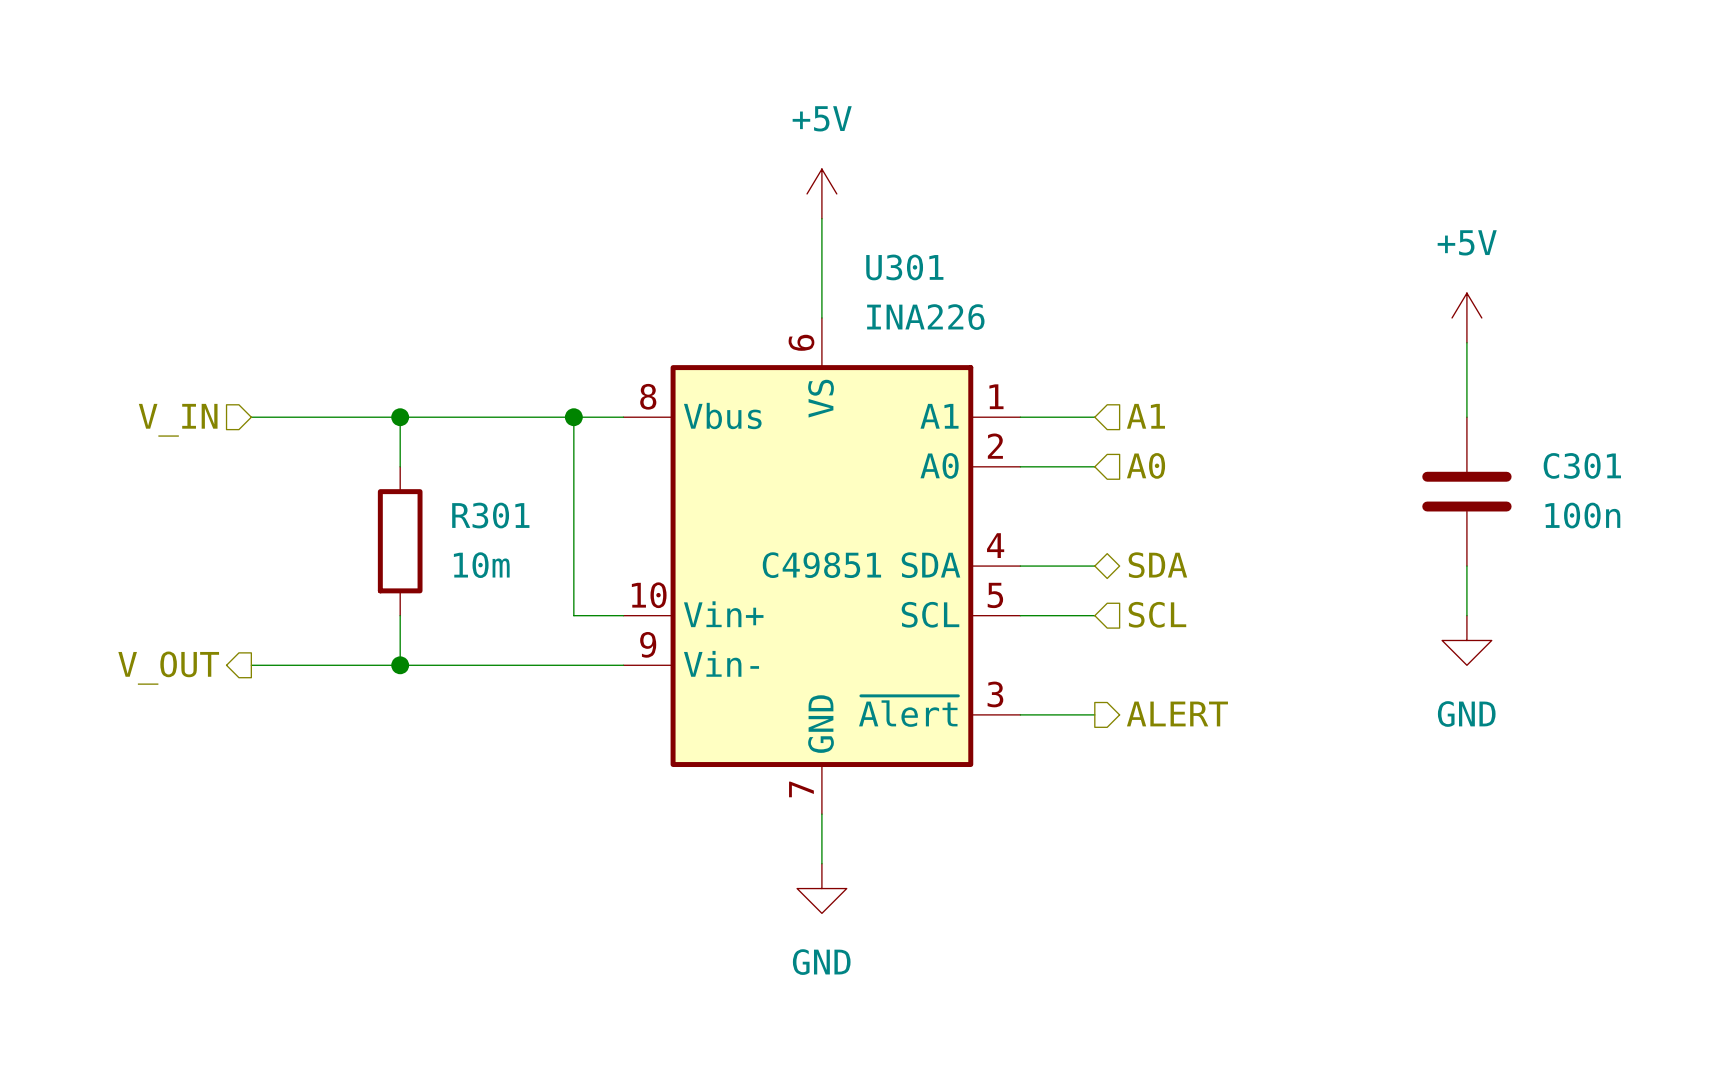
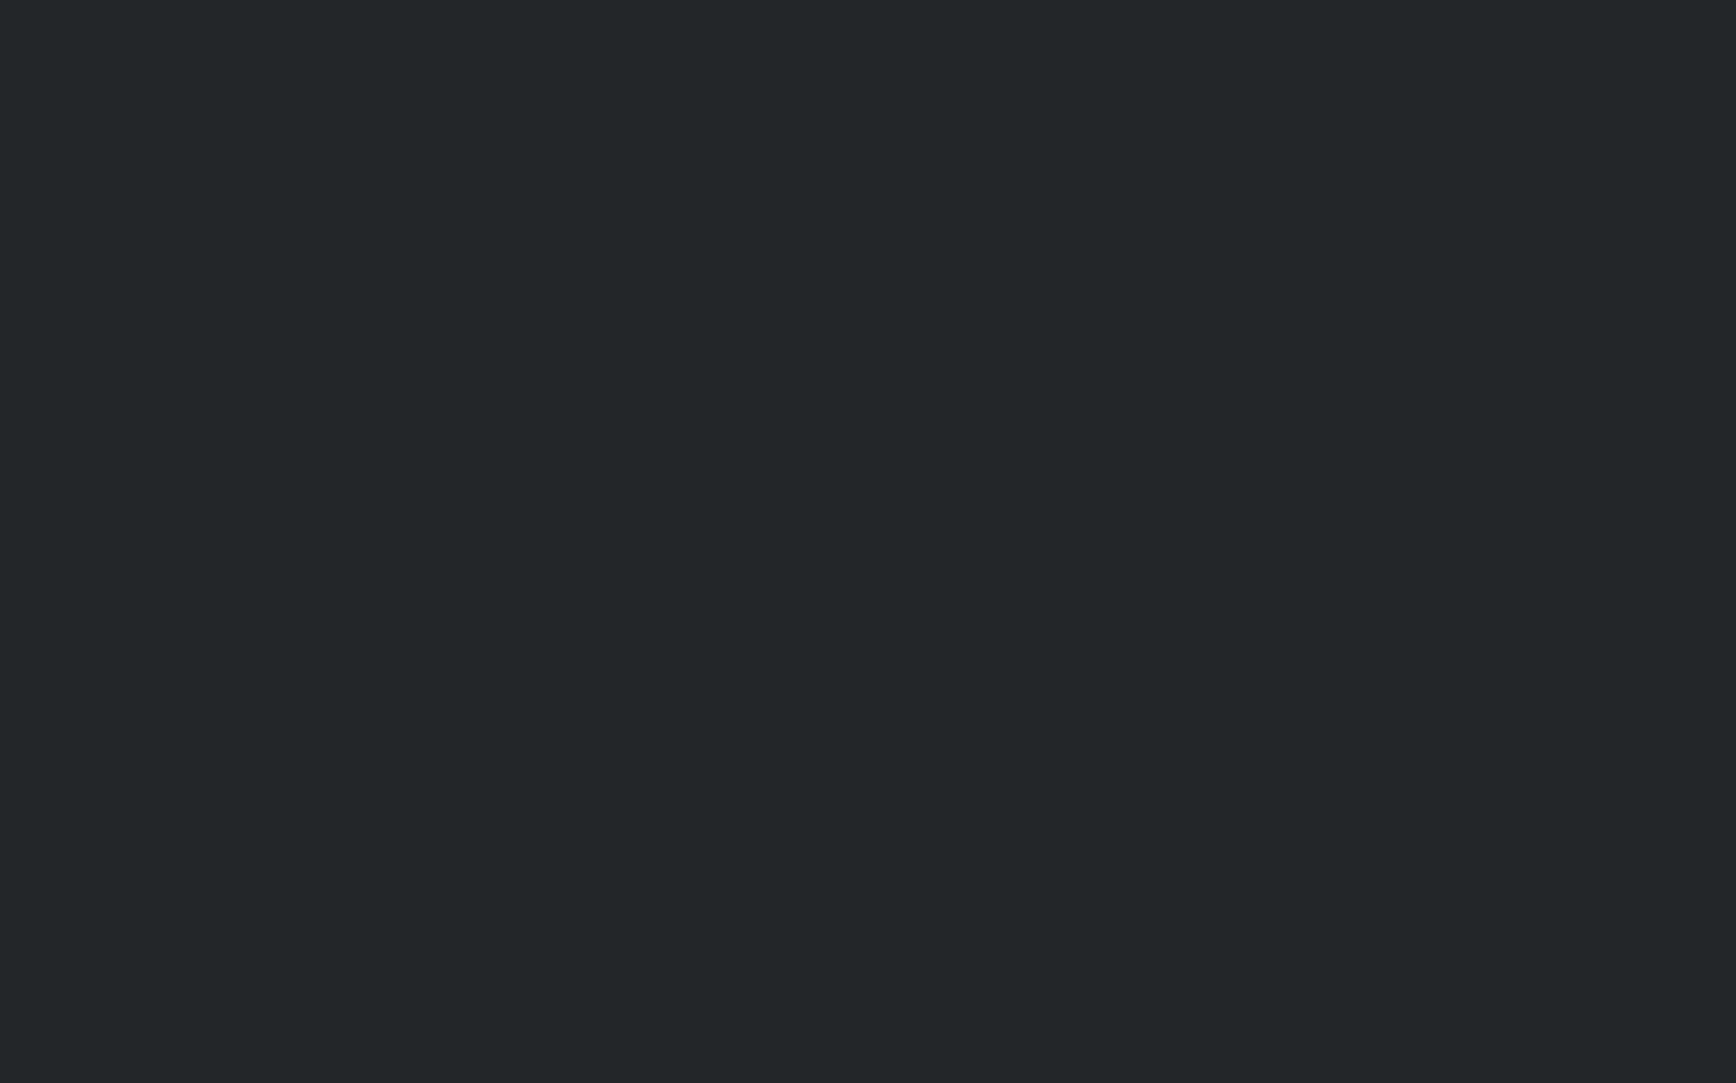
power symbol: +5V (821, 193) -> none
wire: (821, 218) (821, 317) -> none
power symbol: +5V (1466, 317) -> none
wire: (1466, 342) (1466, 417) -> none
hierarchical label: A1 (1145, 416) -> none
wire: (251, 417) (623, 417) -> none
wire: (400, 417) (400, 466) -> none
junction: (400, 417) -> none
wire: (573, 417) (573, 615) (623, 615) -> none
junction: (573, 417) -> none
wire: (1020, 417) (1094, 417) -> none
hierarchical label: V_IN (178, 420) -> none
hierarchical label: A0 (1146, 465) -> none
wire: (1020, 466) (1094, 466) -> none
C301: 100n (1466, 491) -> none
R301: 10m (400, 541) -> none
hierarchical label: SDA (1157, 565) -> none
U301: INA226 (821, 566) -> none
wire: (1020, 566) (1094, 566) -> none
wire: (1466, 566) (1466, 615) -> none
hierarchical label: SCL (1157, 614) -> none
wire: (400, 615) (400, 665) -> none
wire: (1020, 615) (1094, 615) -> none
power symbol: GND (1466, 640) -> none
wire: (251, 665) (623, 665) -> none
junction: (400, 665) -> none
hierarchical label: V_OUT (168, 668) -> none
hierarchical label: ALERT (1177, 713) -> none
wire: (1020, 714) (1094, 714) -> none
wire: (821, 814) (821, 863) -> none
power symbol: GND (821, 888) -> none

